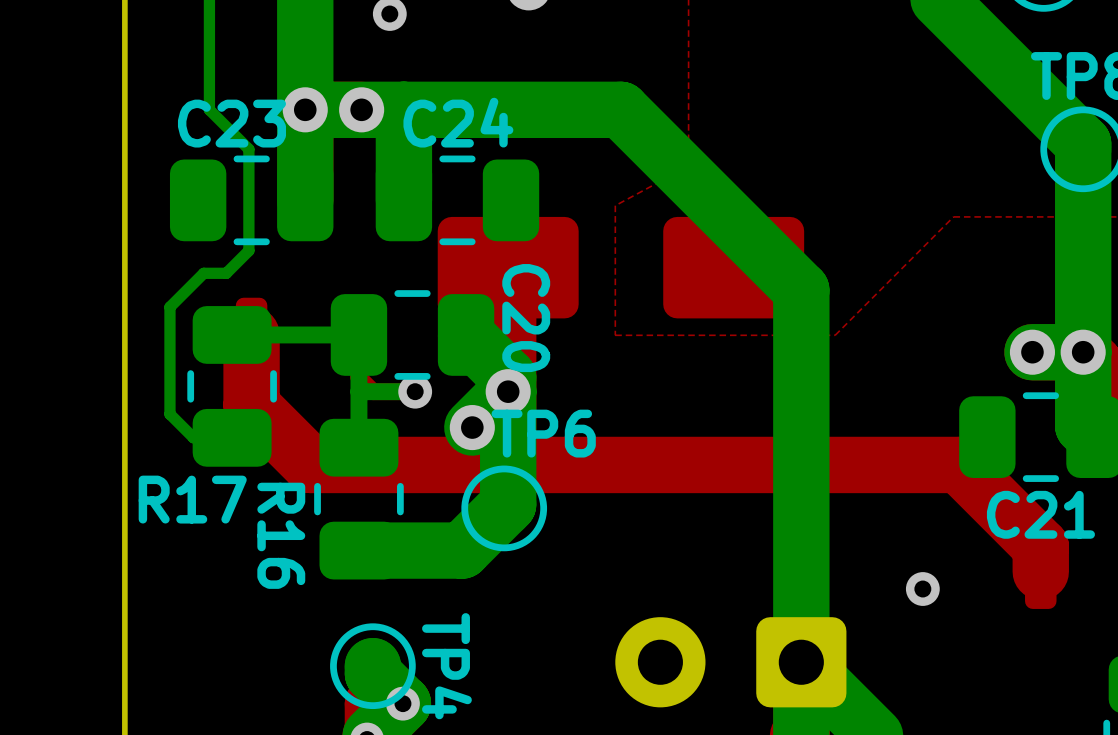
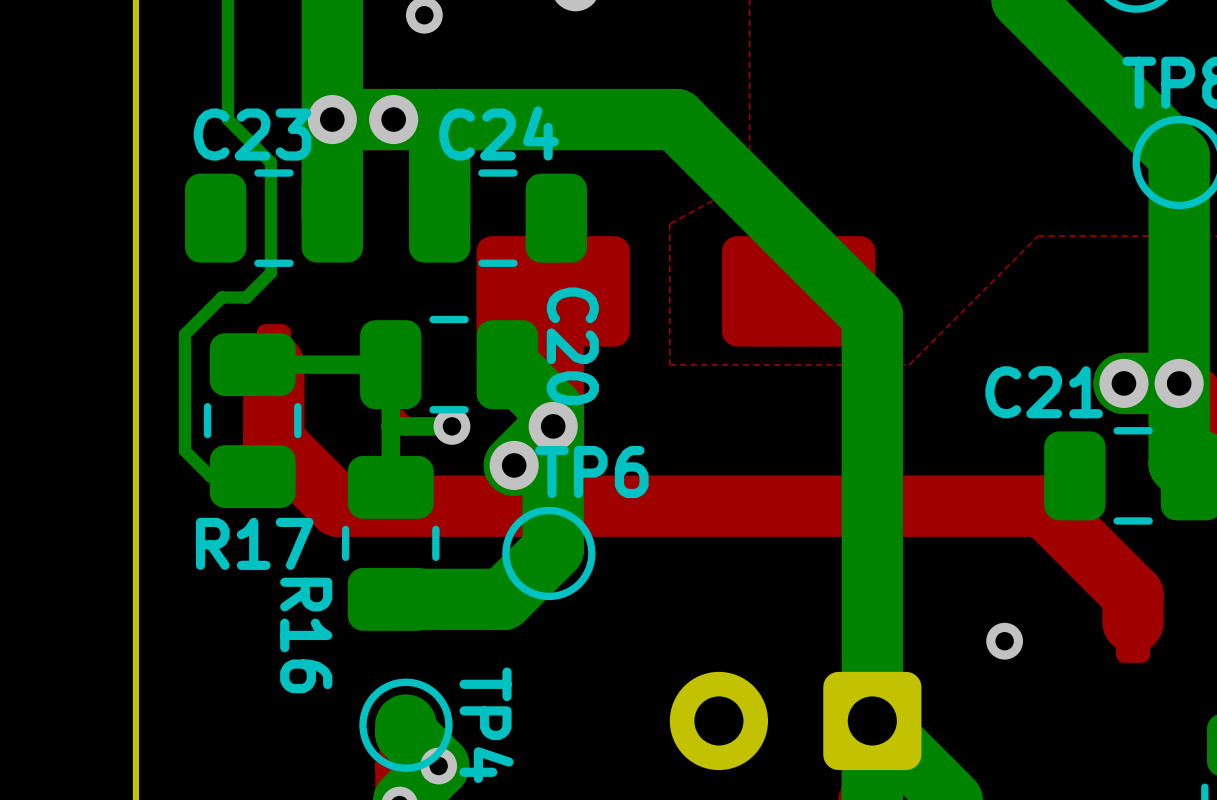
R17 name position: R17 (192, 499) -> R17 (254, 543)
C21 name position: C21 (1040, 514) -> C21 (1044, 392)
R16 name position: R16 (281, 535) -> R16 (306, 635)

